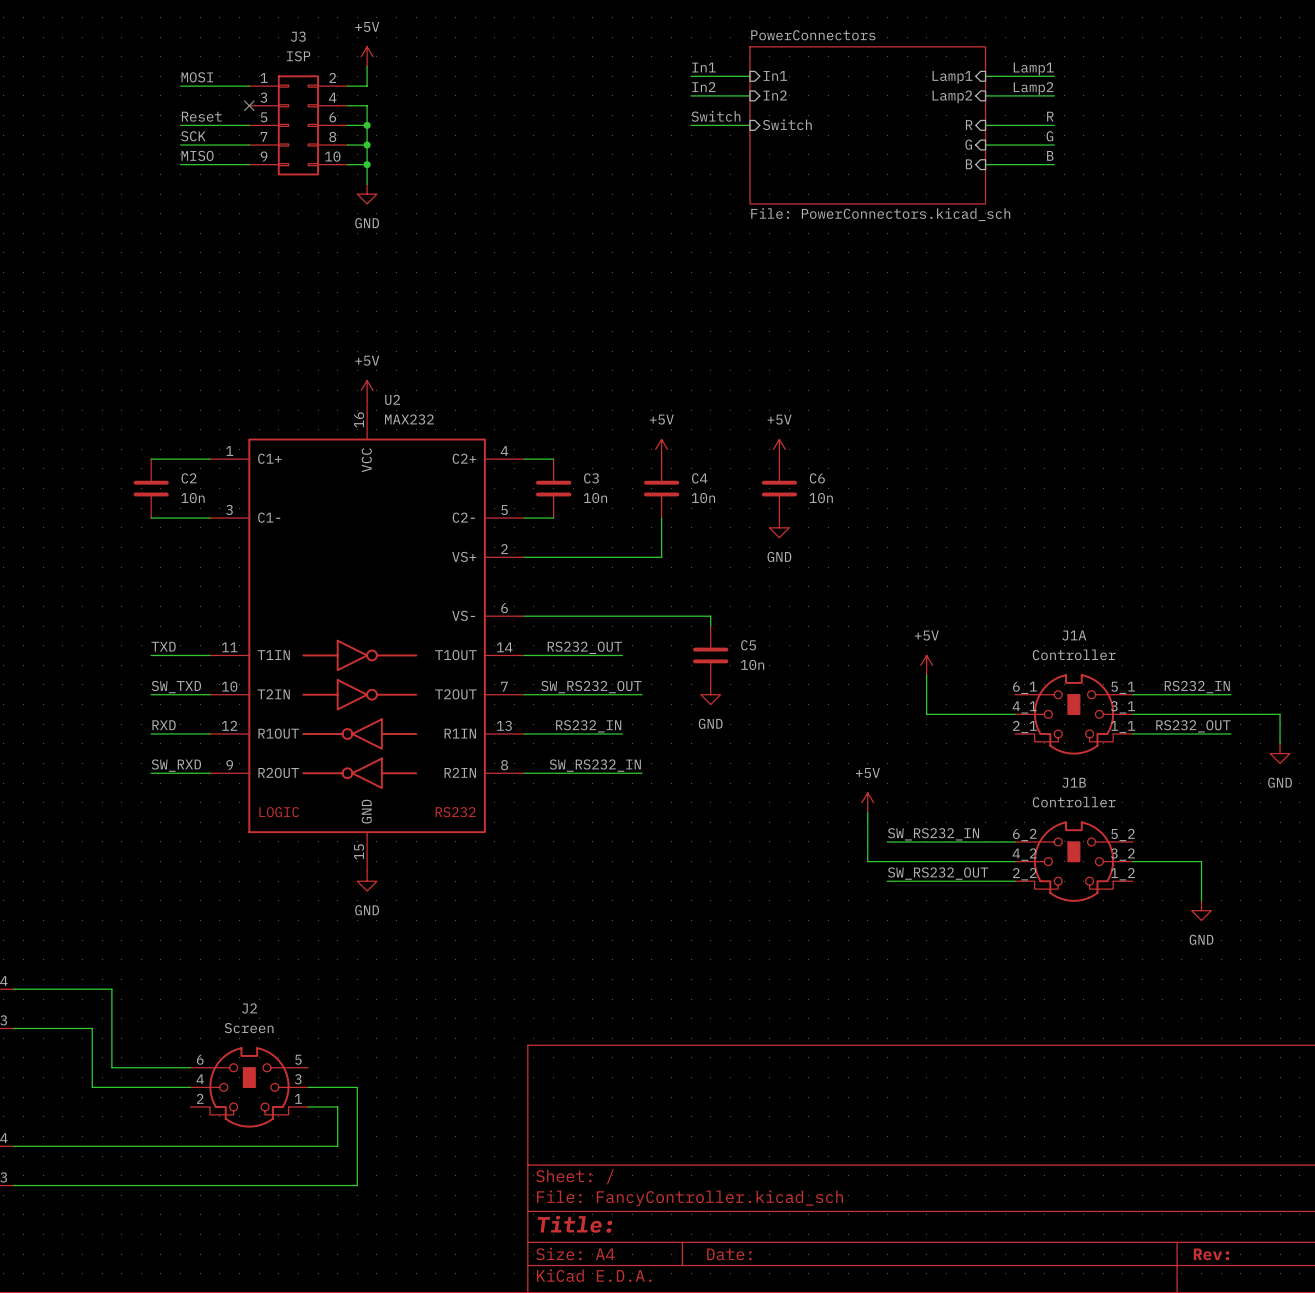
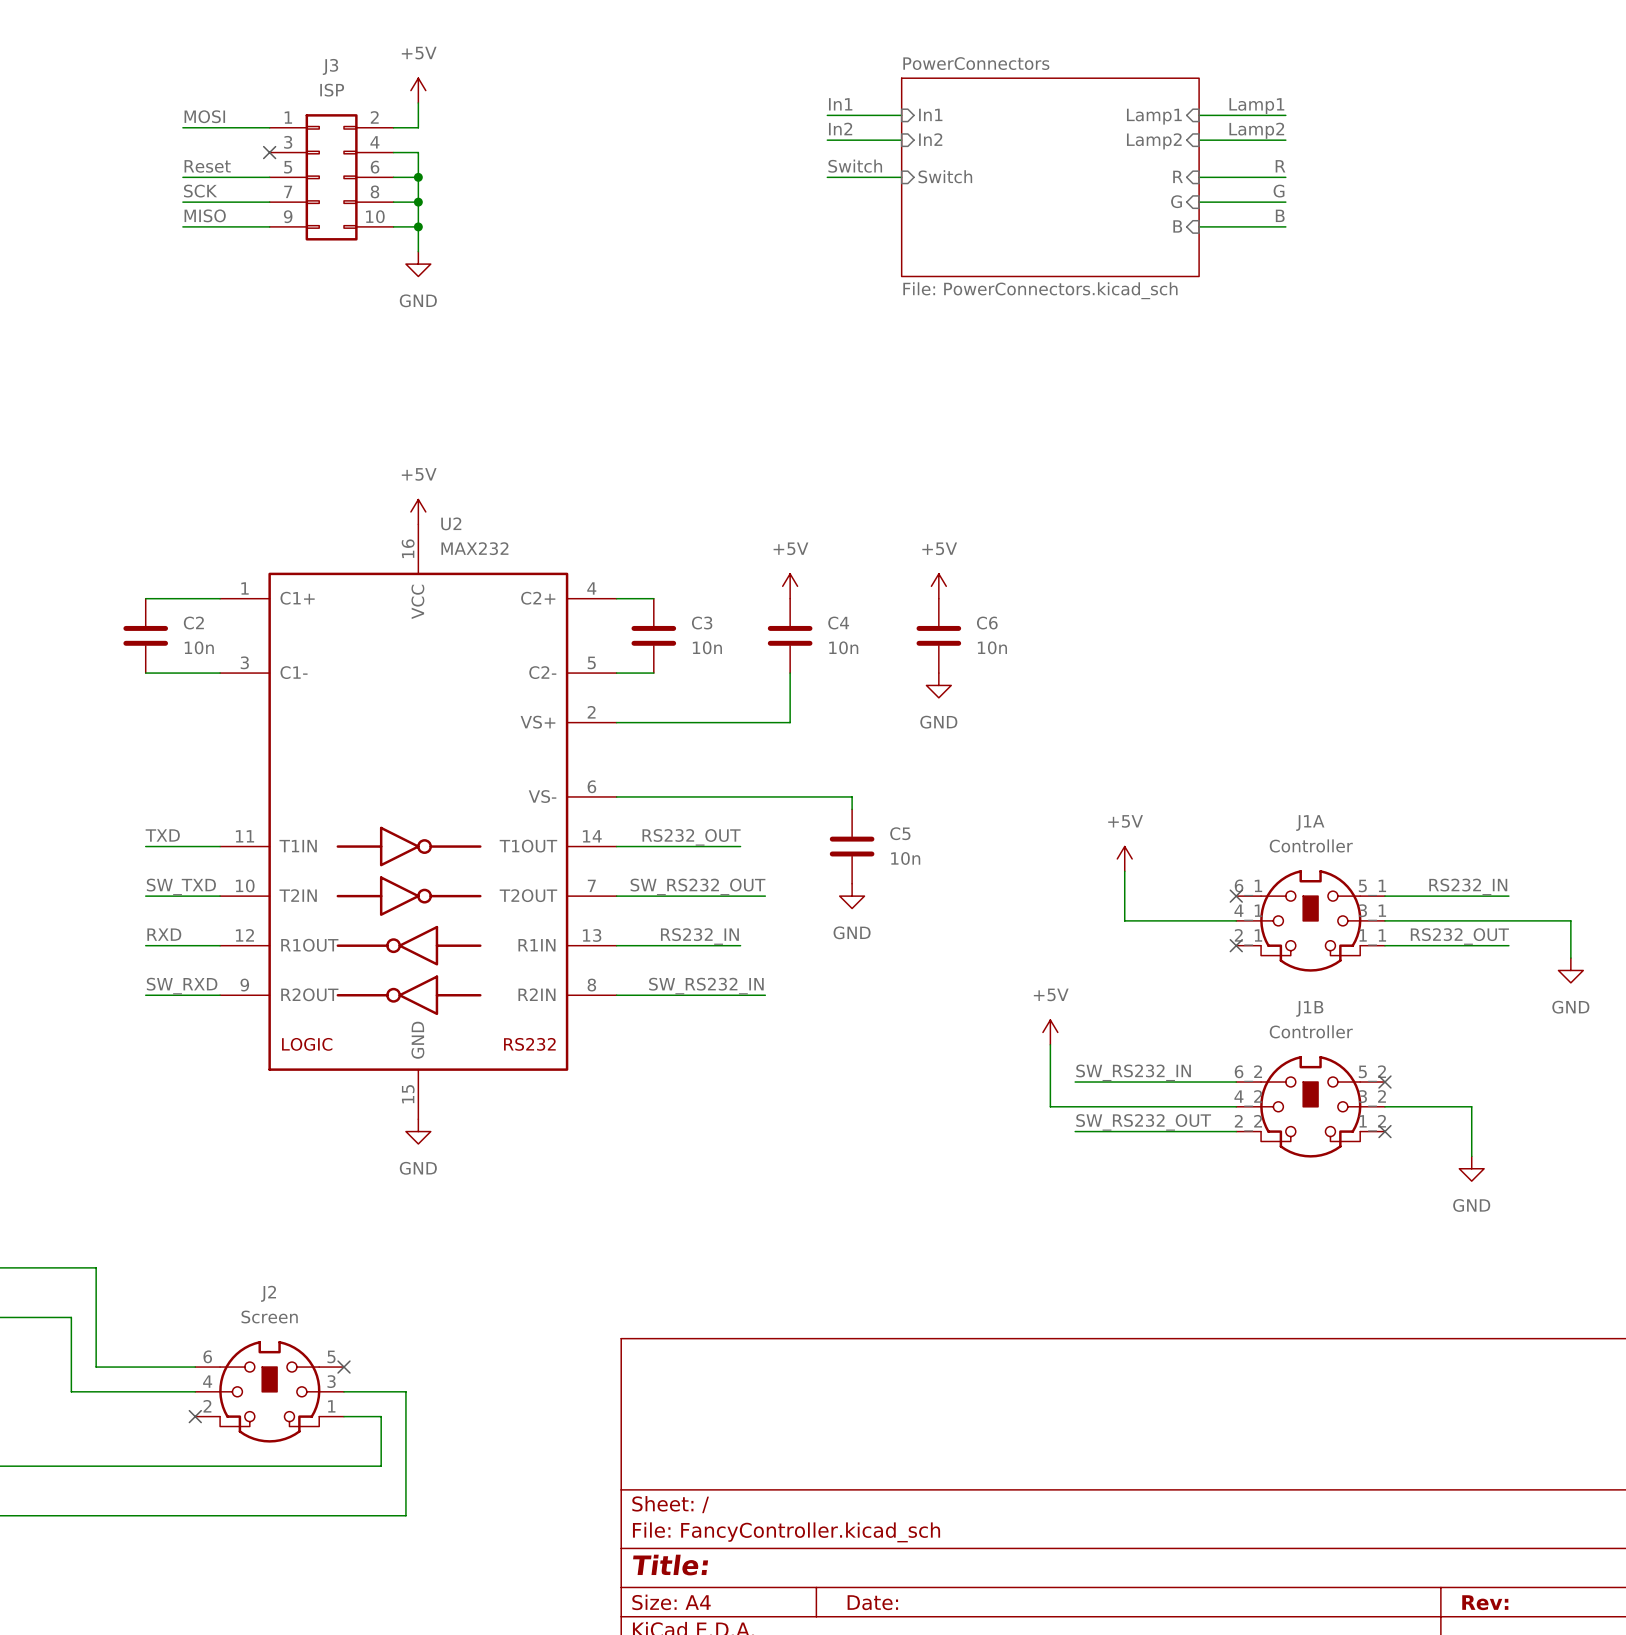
no-connect mark: none -> (1236, 896)
no-connect mark: none -> (1236, 945)
no-connect mark: none -> (1384, 1082)
no-connect mark: none -> (1384, 1131)
no-connect mark: none -> (344, 1367)
no-connect mark: none -> (195, 1416)

